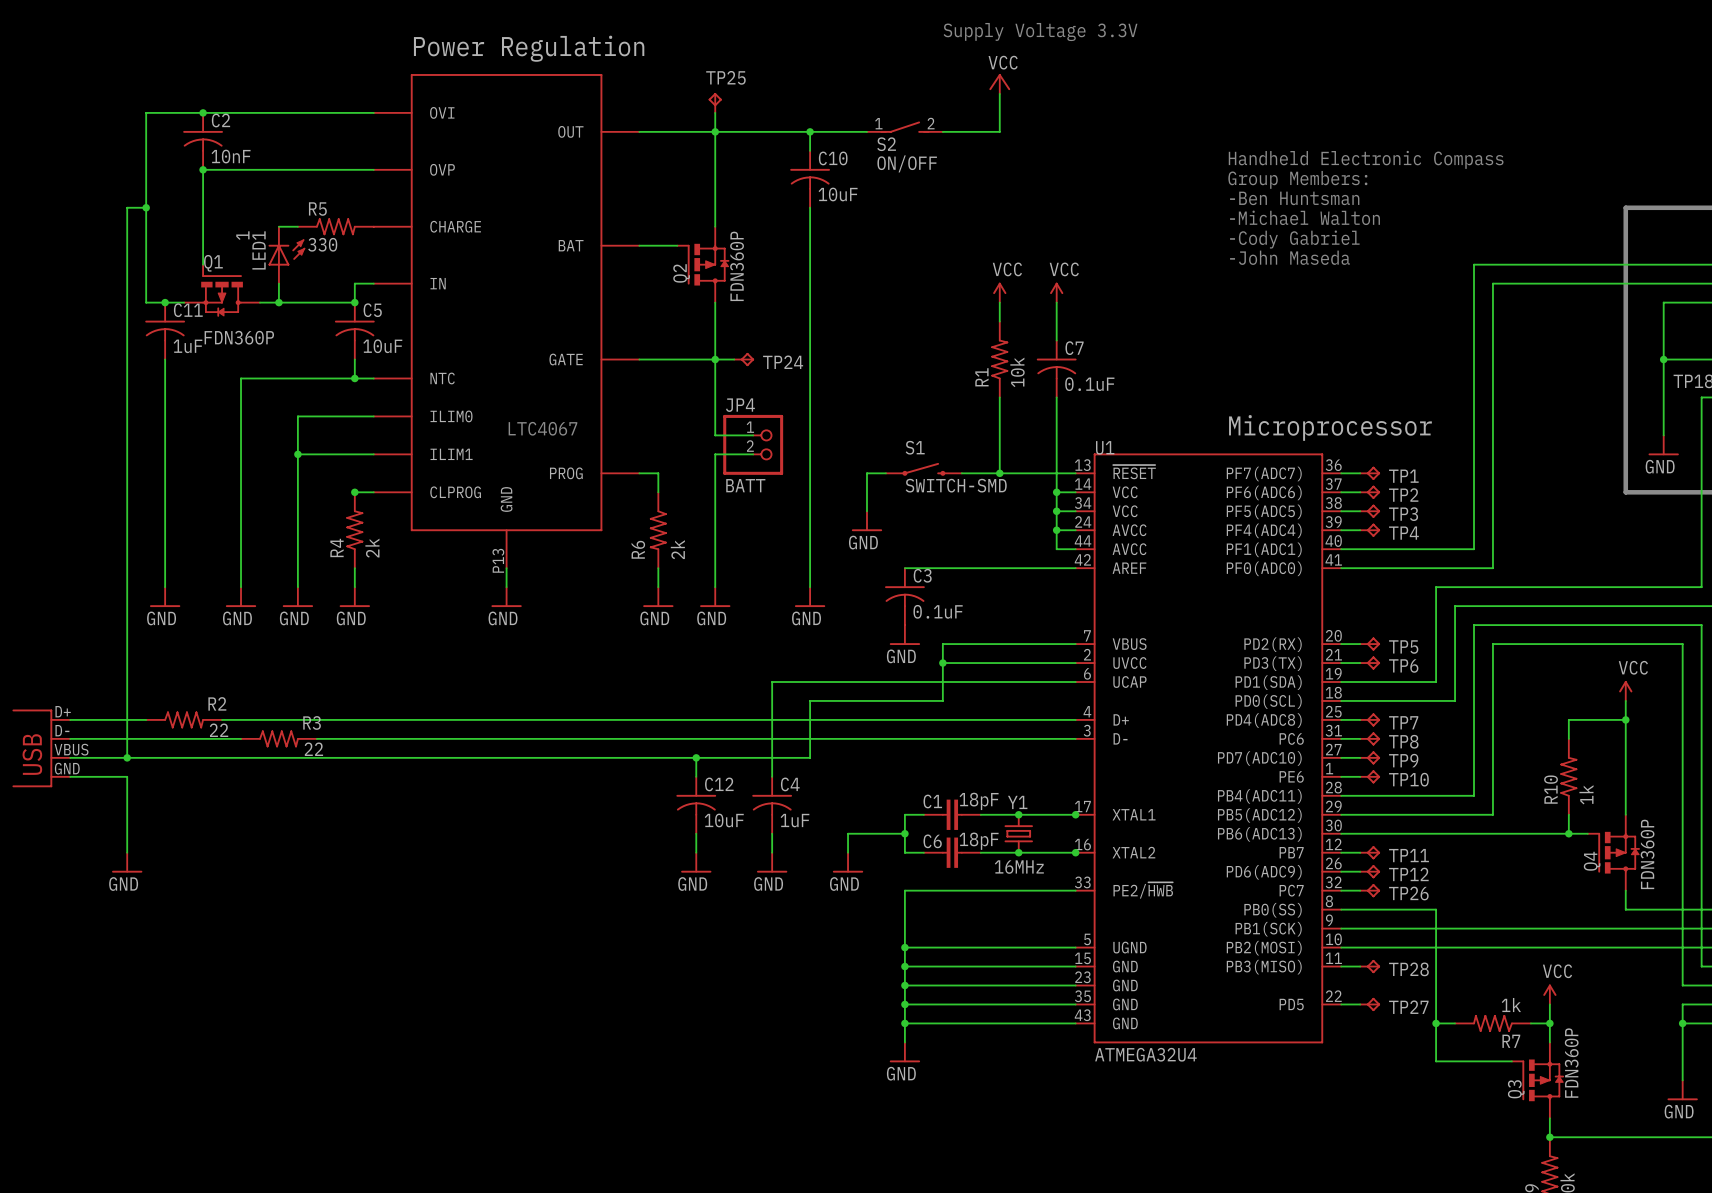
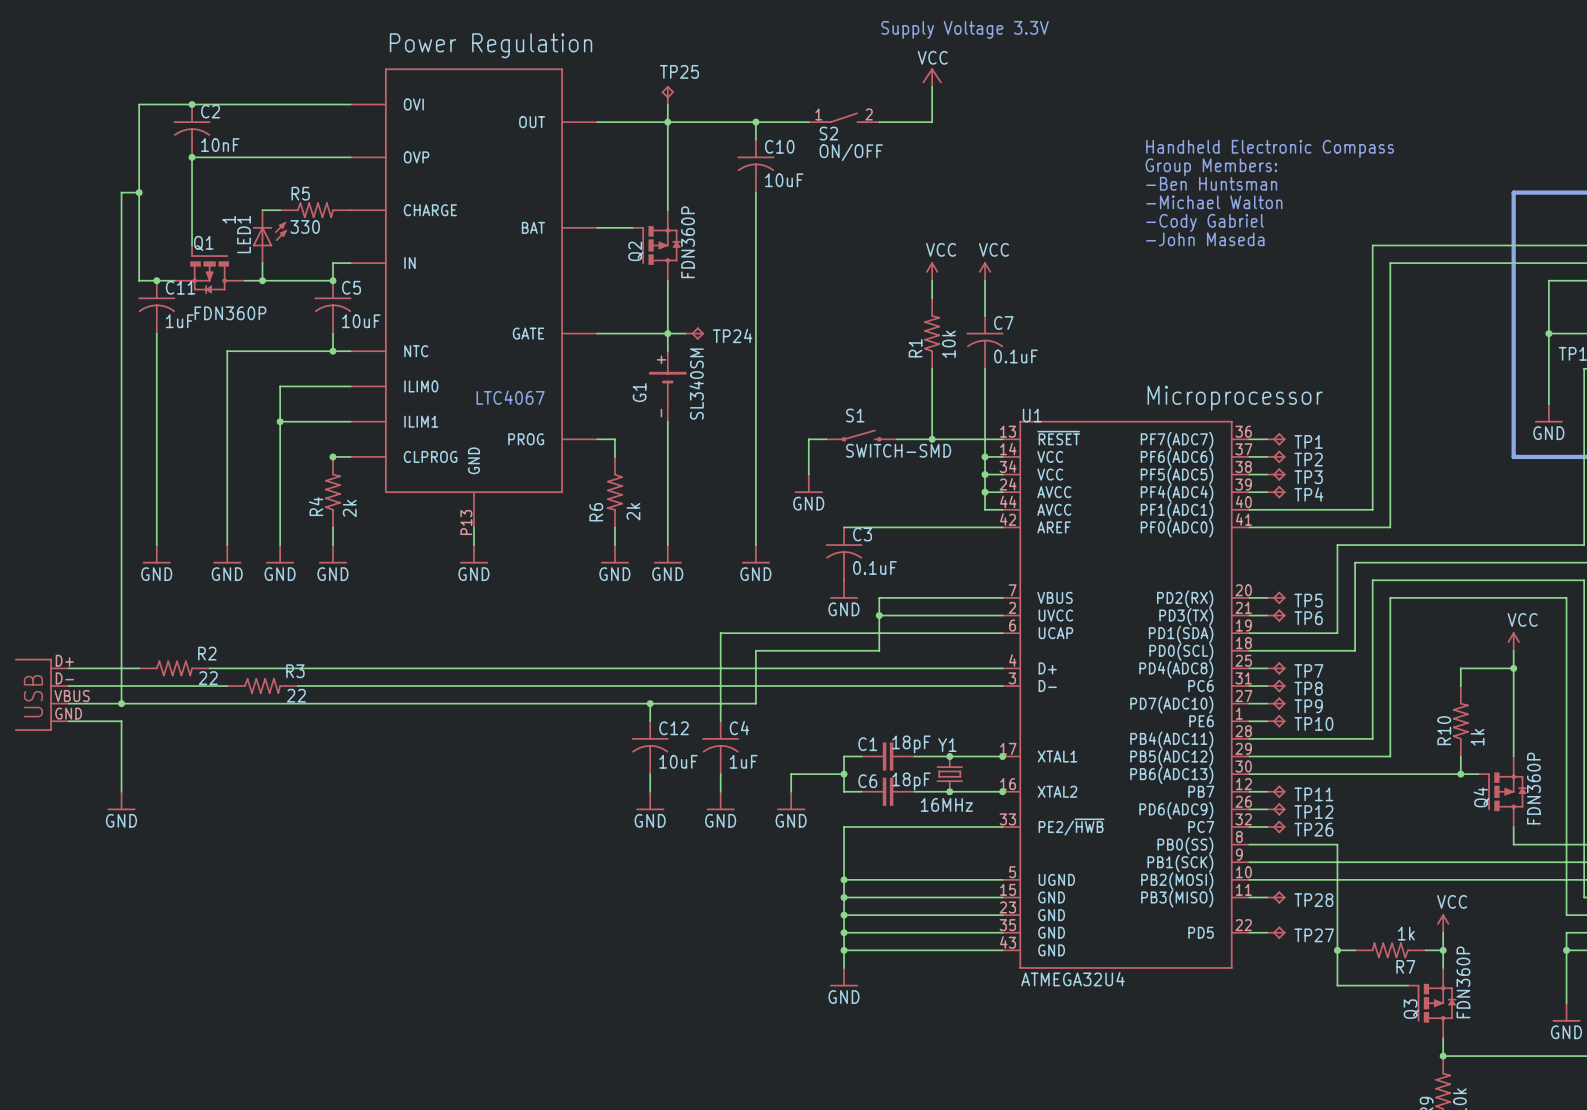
wire: (715, 378) (715, 435) (753, 435) -> none
G1: none -> SL340SM (667, 386)
JP4: BATT (753, 444) -> none
wire: (715, 454) (753, 454) -> none

